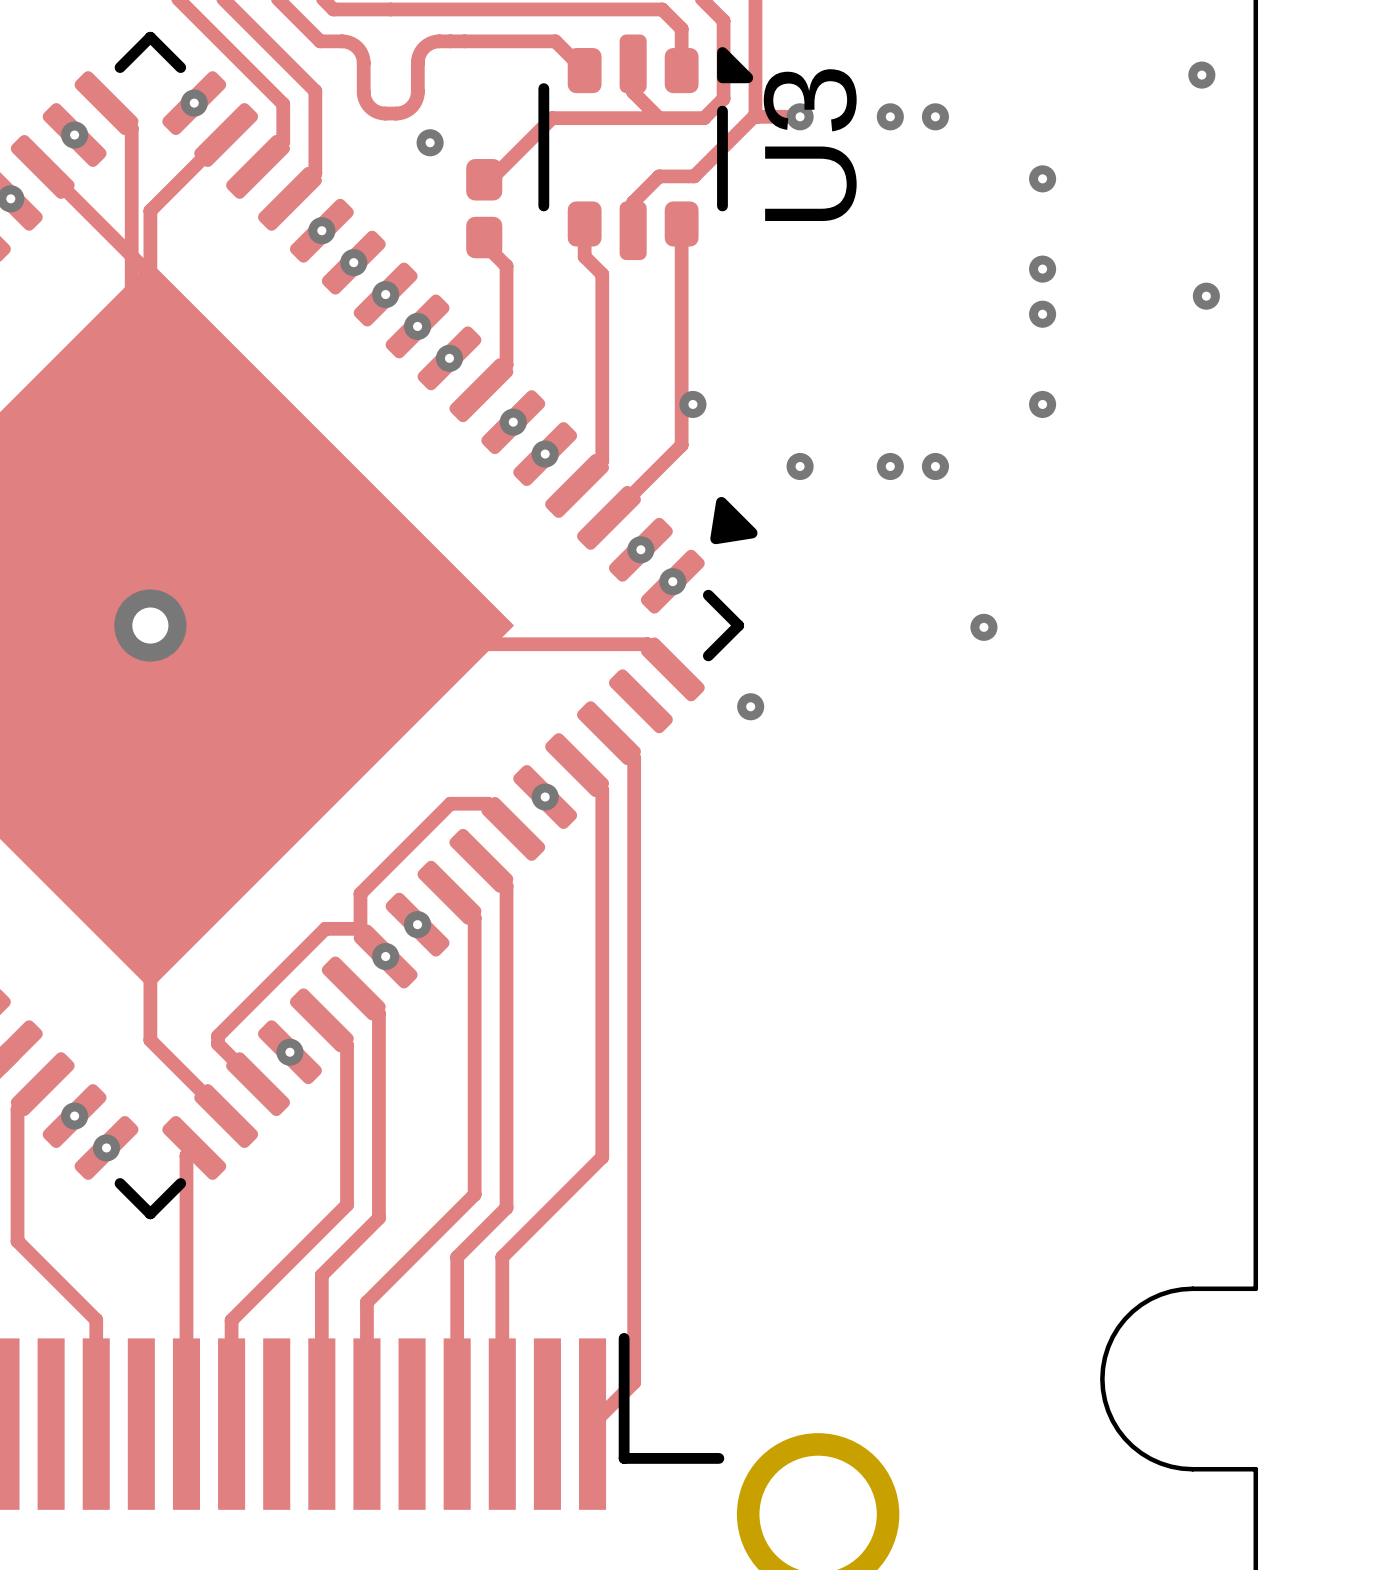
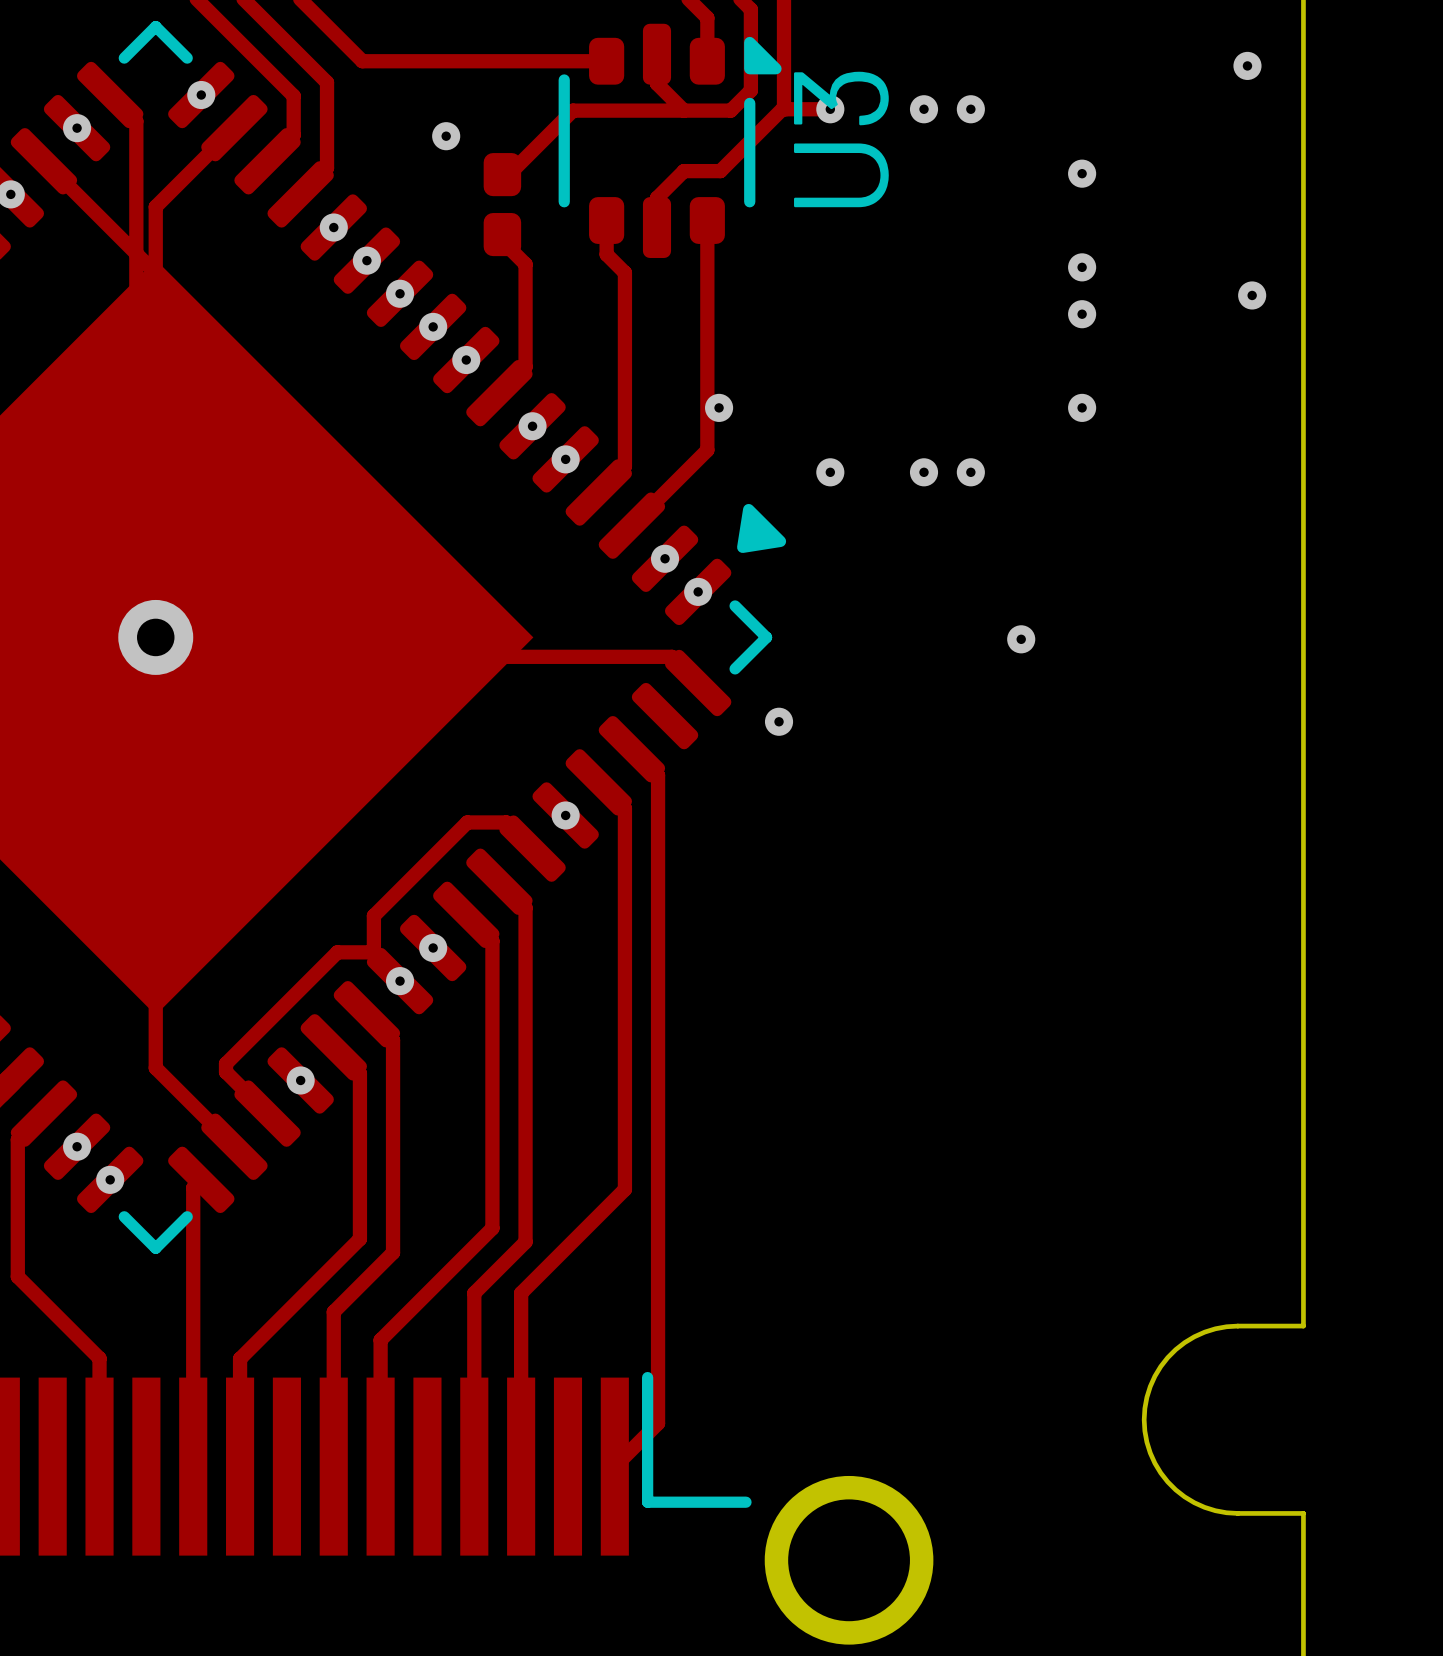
track: (320, 41) (346, 41) (358, 49) (363, 60) (364, 99) (371, 108) (382, 113) (401, 113) (413, 105) (417, 94) (419, 55) (425, 46) (434, 41) (555, 41) (584, 70) -> (332, 30) (362, 61) (606, 61)

